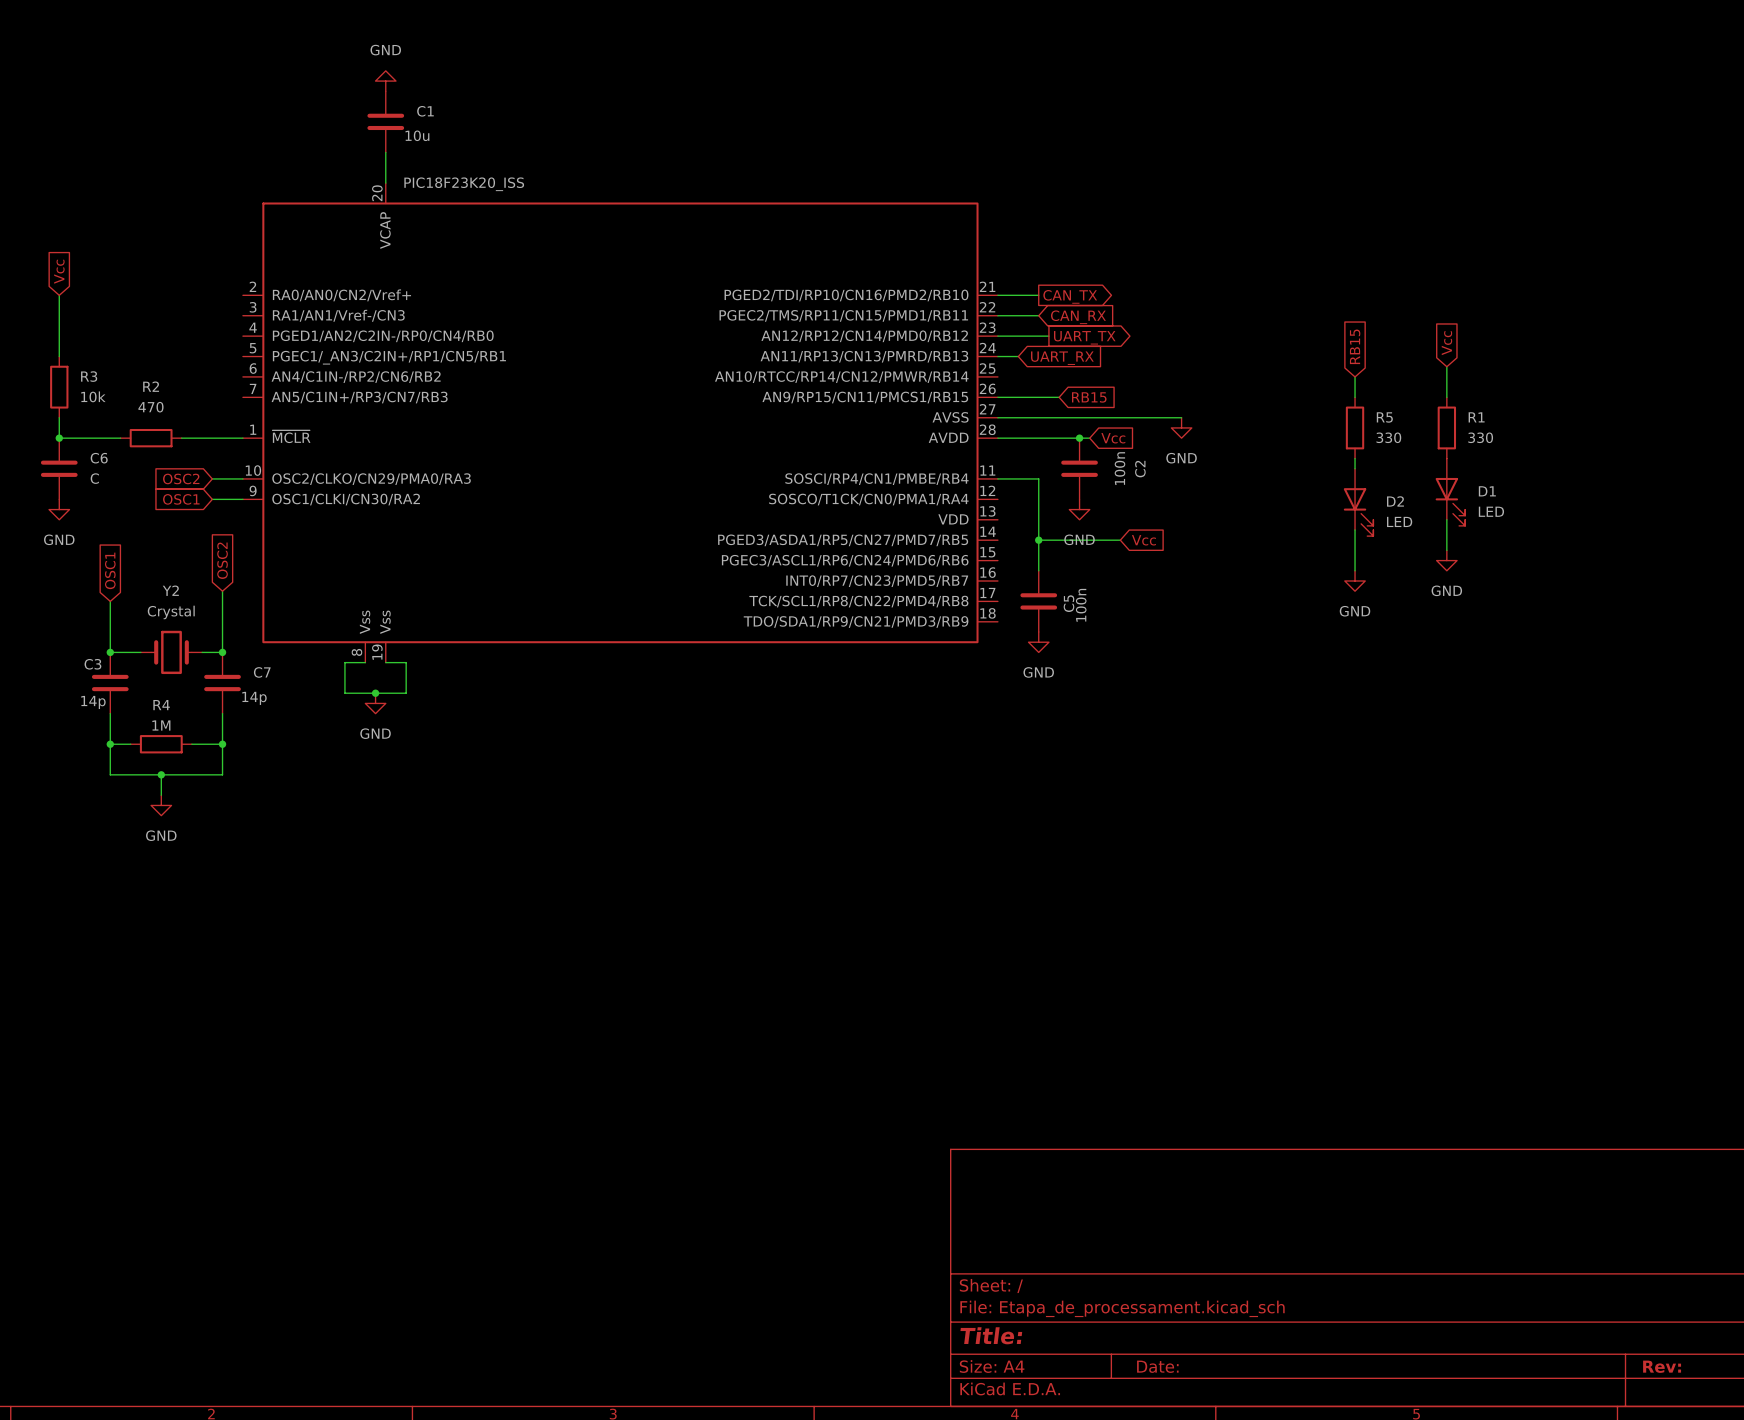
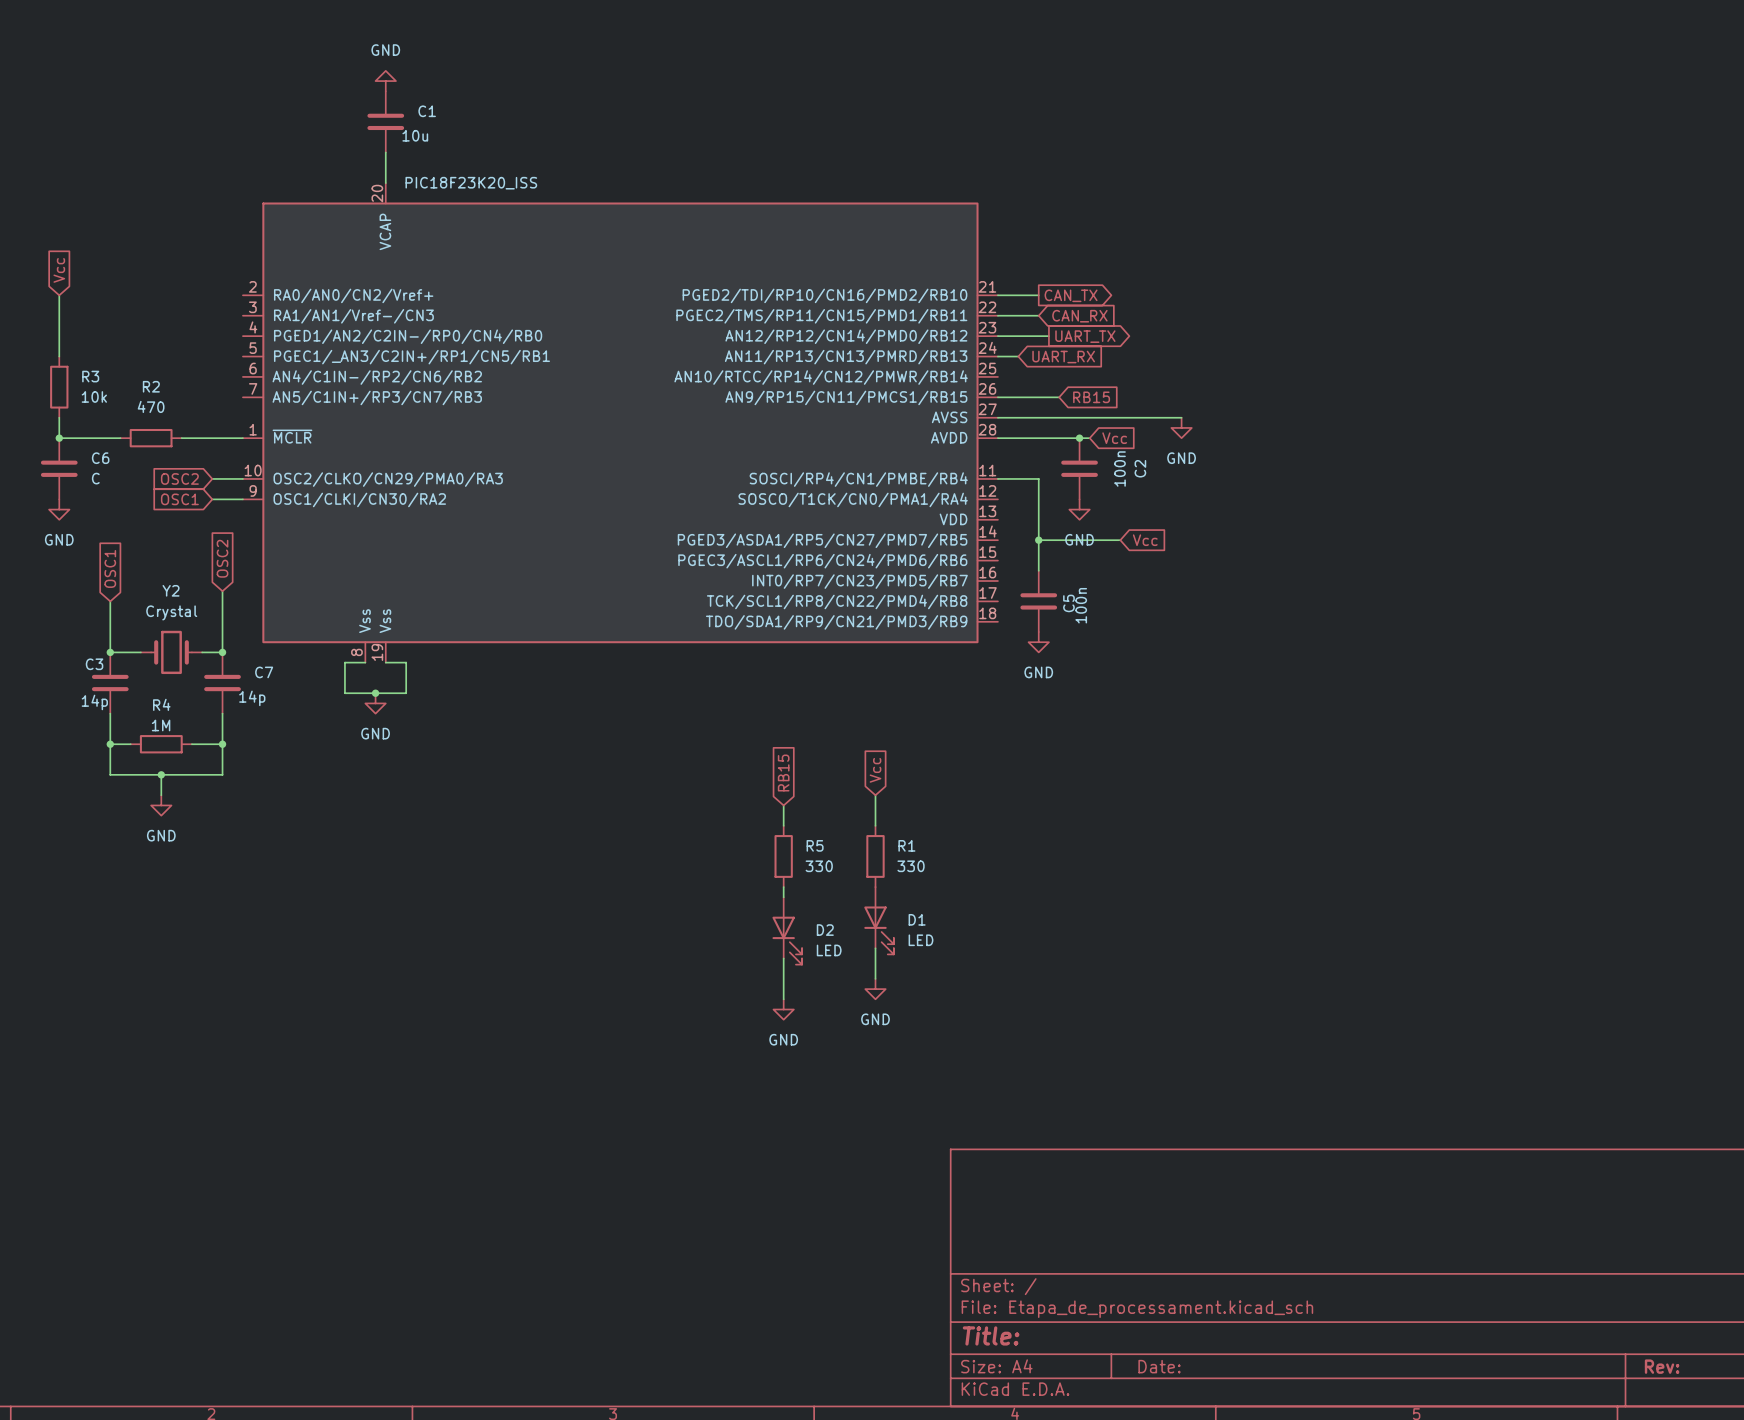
global label: Vcc (1446, 343) -> none
global label: RB15 (1355, 346) -> none
wire: (1446, 366) (1446, 397) -> none
wire: (1355, 376) (1355, 397) -> none
R5 position: (1355, 427) -> (783, 856)
R1 position: (1446, 427) -> (875, 856)
wire: (1355, 458) (1355, 468) -> none
D1 position: (1450, 492) -> (879, 920)
D2 position: (1358, 502) -> (787, 930)
wire: (1446, 519) (1446, 550) -> none
wire: (1355, 529) (1355, 570) -> none
power symbol: GND (1446, 560) -> none
power symbol: GND (1355, 580) -> none
global label: none -> Vcc (875, 770)
global label: none -> RB15 (783, 773)
wire: none -> (875, 795) (875, 825)
wire: none -> (783, 805) (783, 825)
wire: none -> (783, 887) (783, 897)
wire: none -> (875, 948) (875, 978)
wire: none -> (783, 958) (783, 999)
power symbol: none -> GND (875, 989)
power symbol: none -> GND (783, 1009)

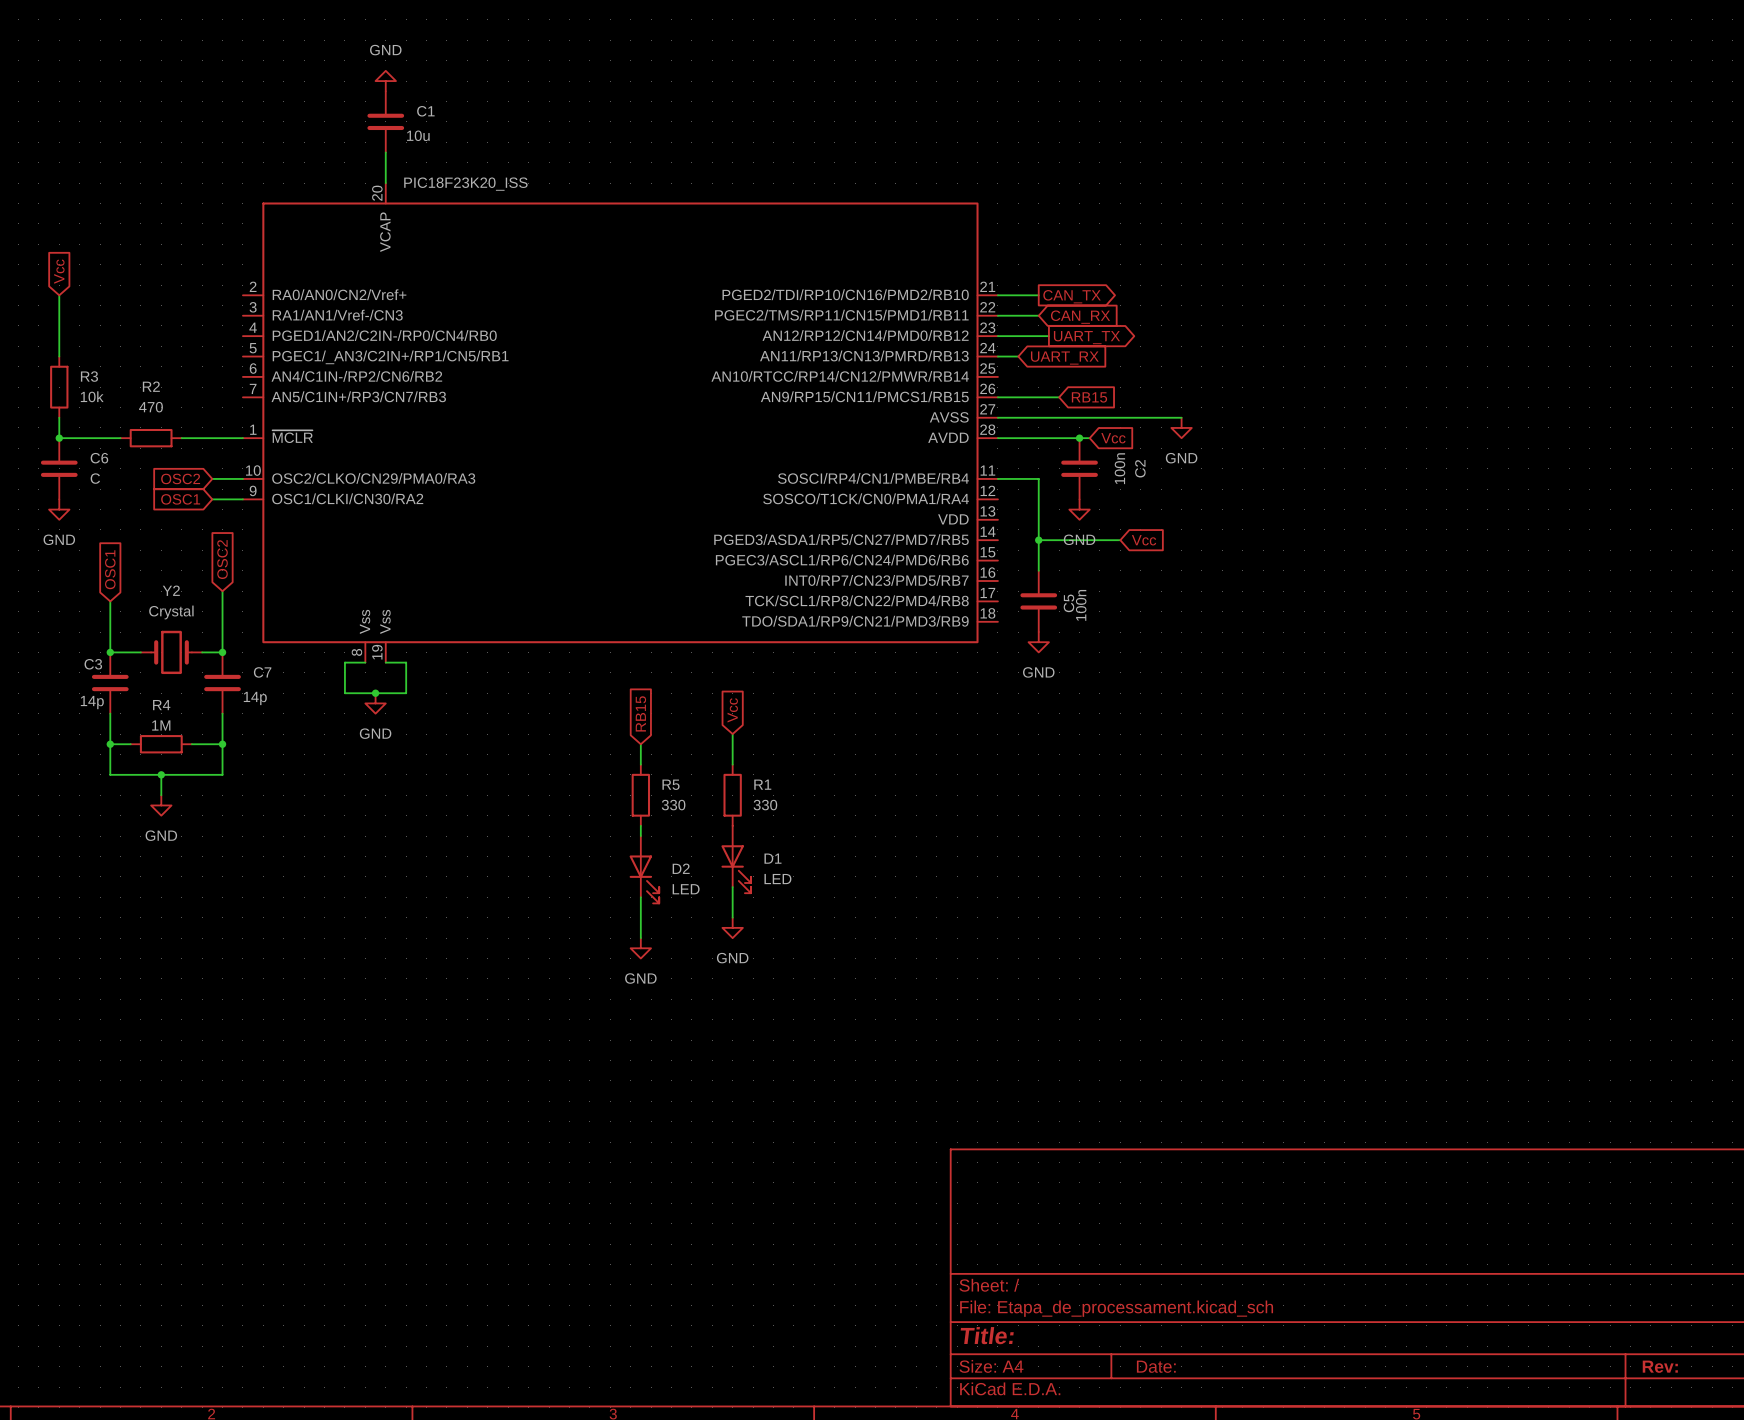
global label position: Vcc (875, 770) -> Vcc (732, 710)
global label position: RB15 (783, 773) -> RB15 (640, 713)
wire: (875, 795) (875, 825) -> (732, 734) (732, 764)
wire: (783, 805) (783, 825) -> (640, 744) (640, 764)
R5 position: (783, 856) -> (640, 795)
R1 position: (875, 856) -> (732, 795)
wire: (783, 887) (783, 897) -> (640, 825) (640, 836)
D1 position: (879, 920) -> (736, 859)
power symbol: none -> GND (732, 927)
D2 position: (787, 930) -> (644, 869)
power symbol: none -> GND (640, 948)
wire: (875, 948) (875, 978) -> (732, 887) (732, 917)
wire: (783, 958) (783, 999) -> (640, 897) (640, 938)
power symbol: GND (875, 989) -> none
power symbol: GND (783, 1009) -> none

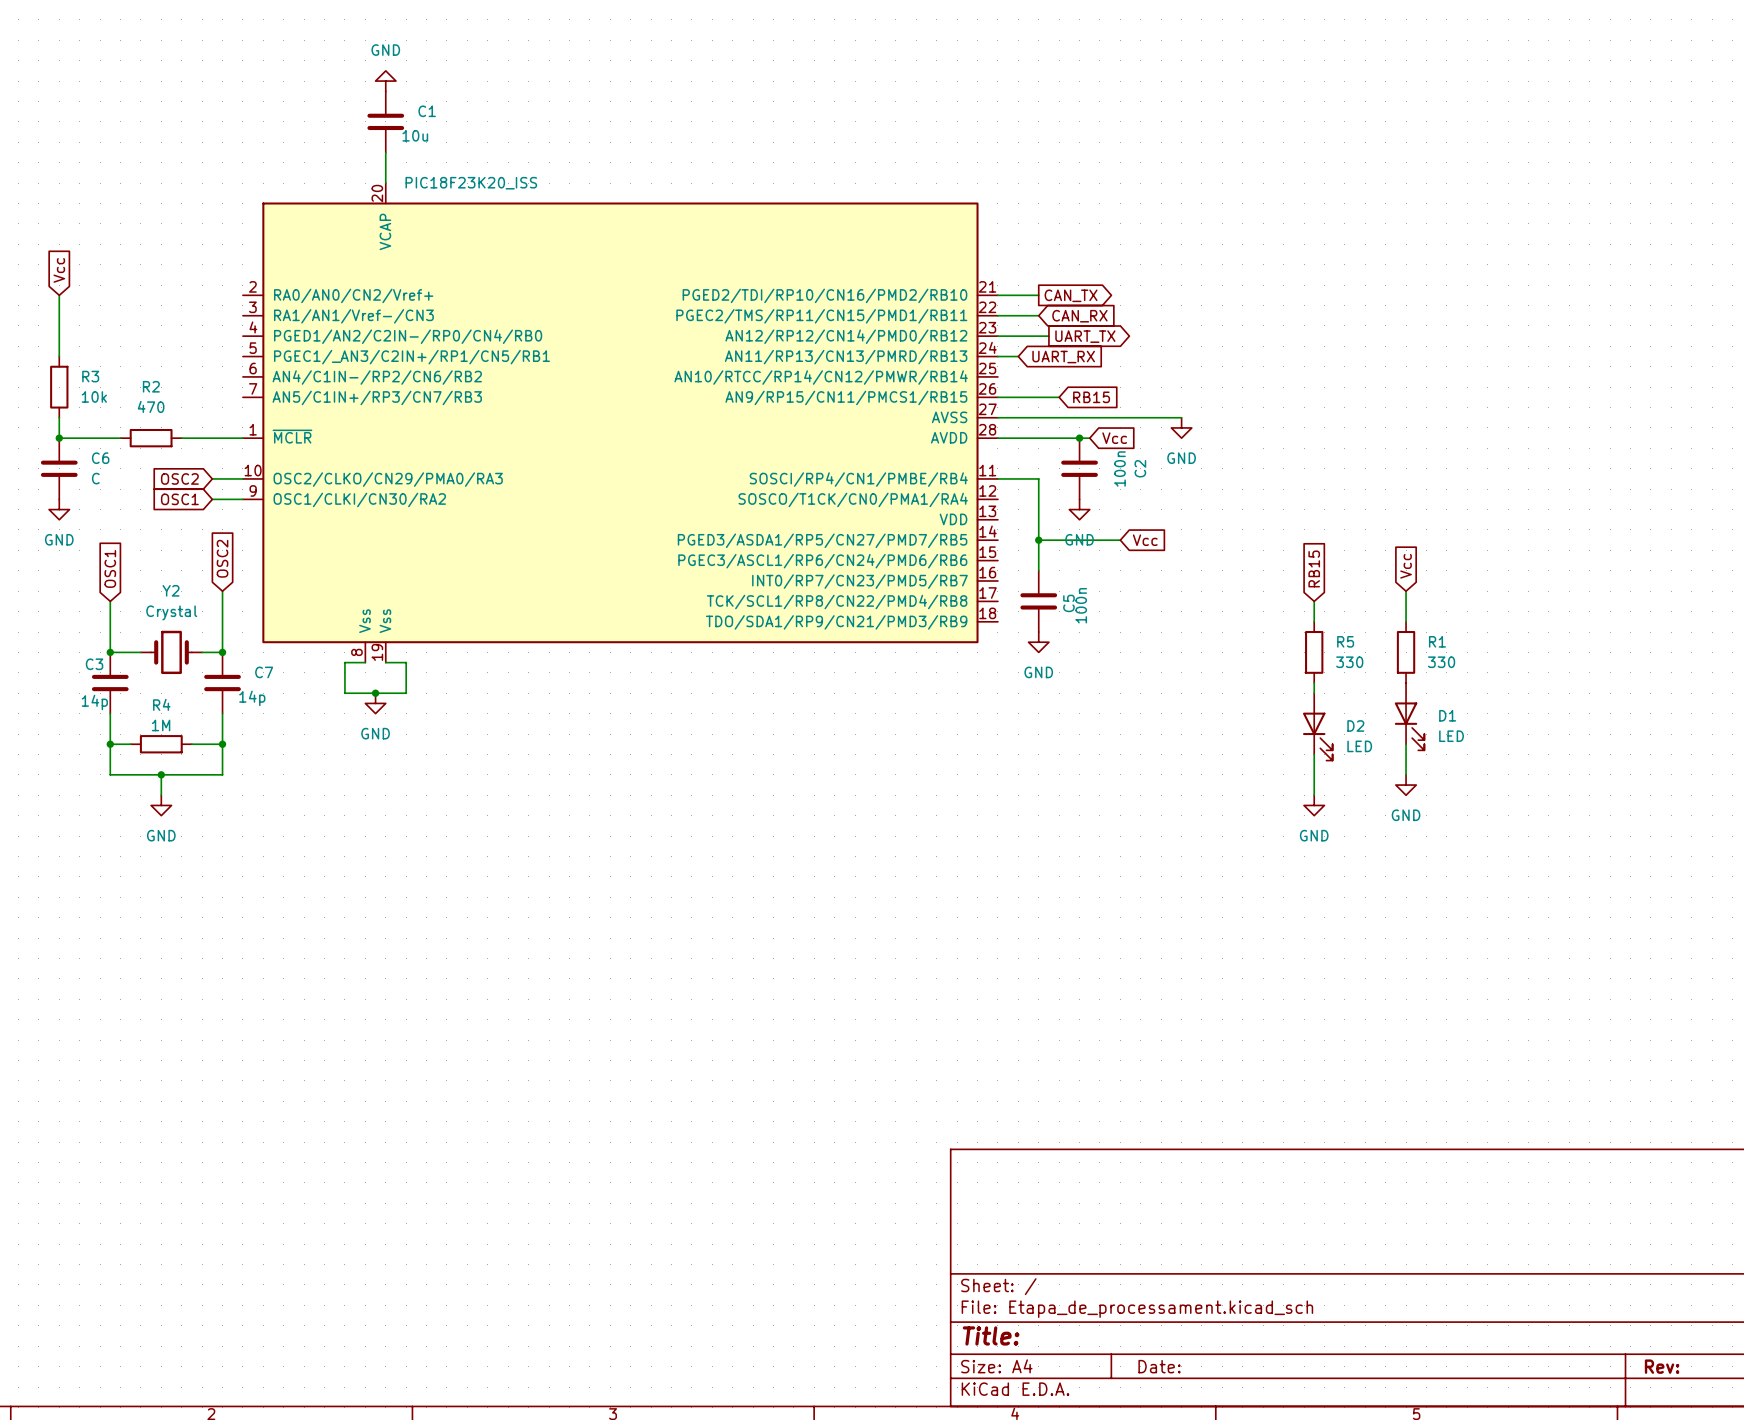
global label: none -> Vcc (1406, 566)
global label: none -> RB15 (1314, 568)
wire: none -> (1406, 591) (1406, 621)
wire: none -> (1314, 601) (1314, 621)
wire: none -> (1314, 683) (1314, 693)
global label: Vcc (732, 710) -> none
global label: RB15 (640, 713) -> none
wire: (732, 734) (732, 764) -> none
wire: (640, 744) (640, 764) -> none
wire: none -> (1406, 744) (1406, 774)
wire: none -> (1314, 754) (1314, 795)
power symbol: none -> GND (1406, 785)
R5 position: (640, 795) -> (1314, 652)
R1 position: (732, 795) -> (1406, 652)
power symbol: none -> GND (1314, 805)
wire: (640, 825) (640, 836) -> none
D1 position: (736, 859) -> (1409, 716)
D2 position: (644, 869) -> (1317, 726)
wire: (732, 887) (732, 917) -> none
wire: (640, 897) (640, 938) -> none
power symbol: GND (732, 927) -> none
power symbol: GND (640, 948) -> none

